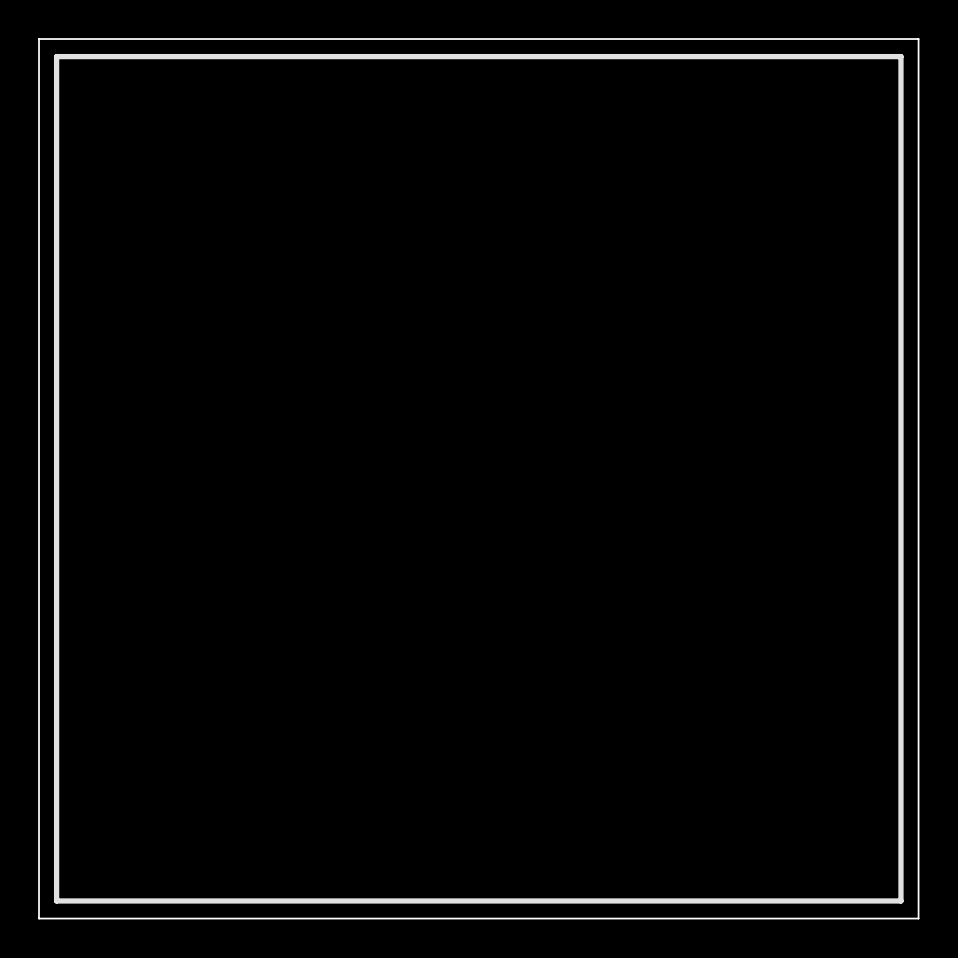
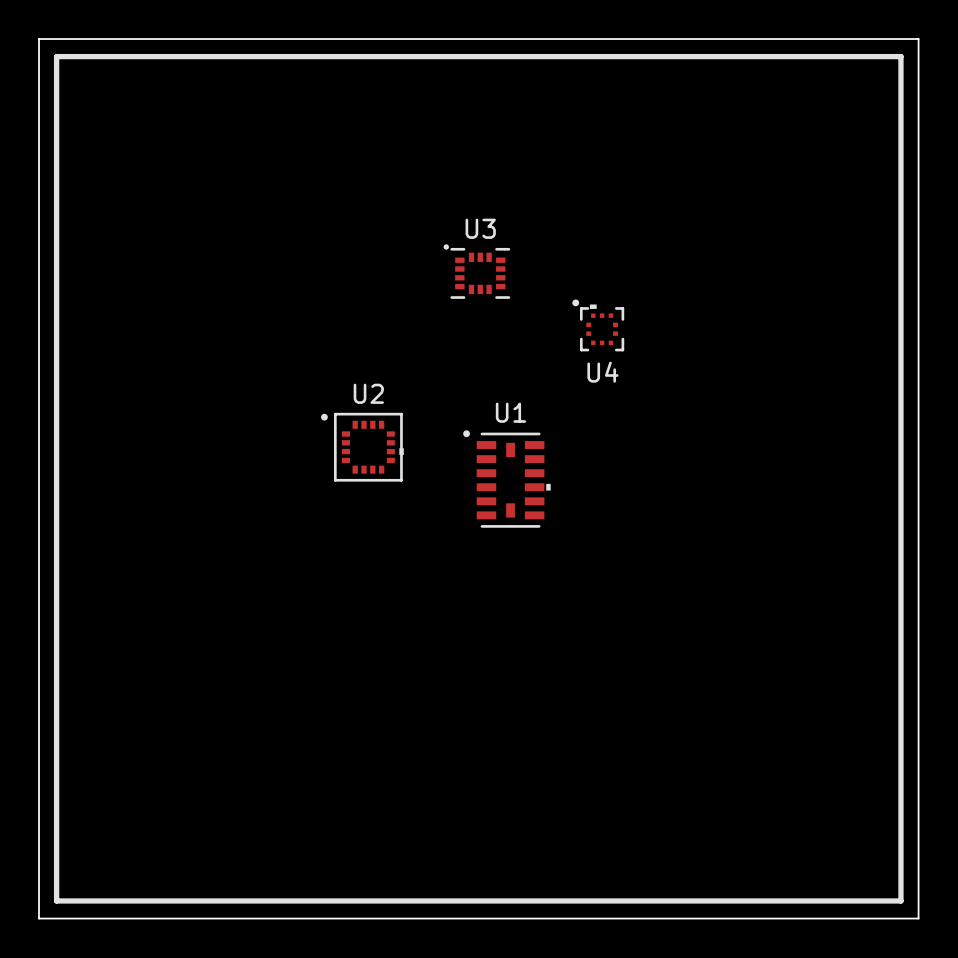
U3: none -> (476, 271)
U4: none -> (598, 325)
U2: none -> (362, 447)
U1: none -> (506, 479)

